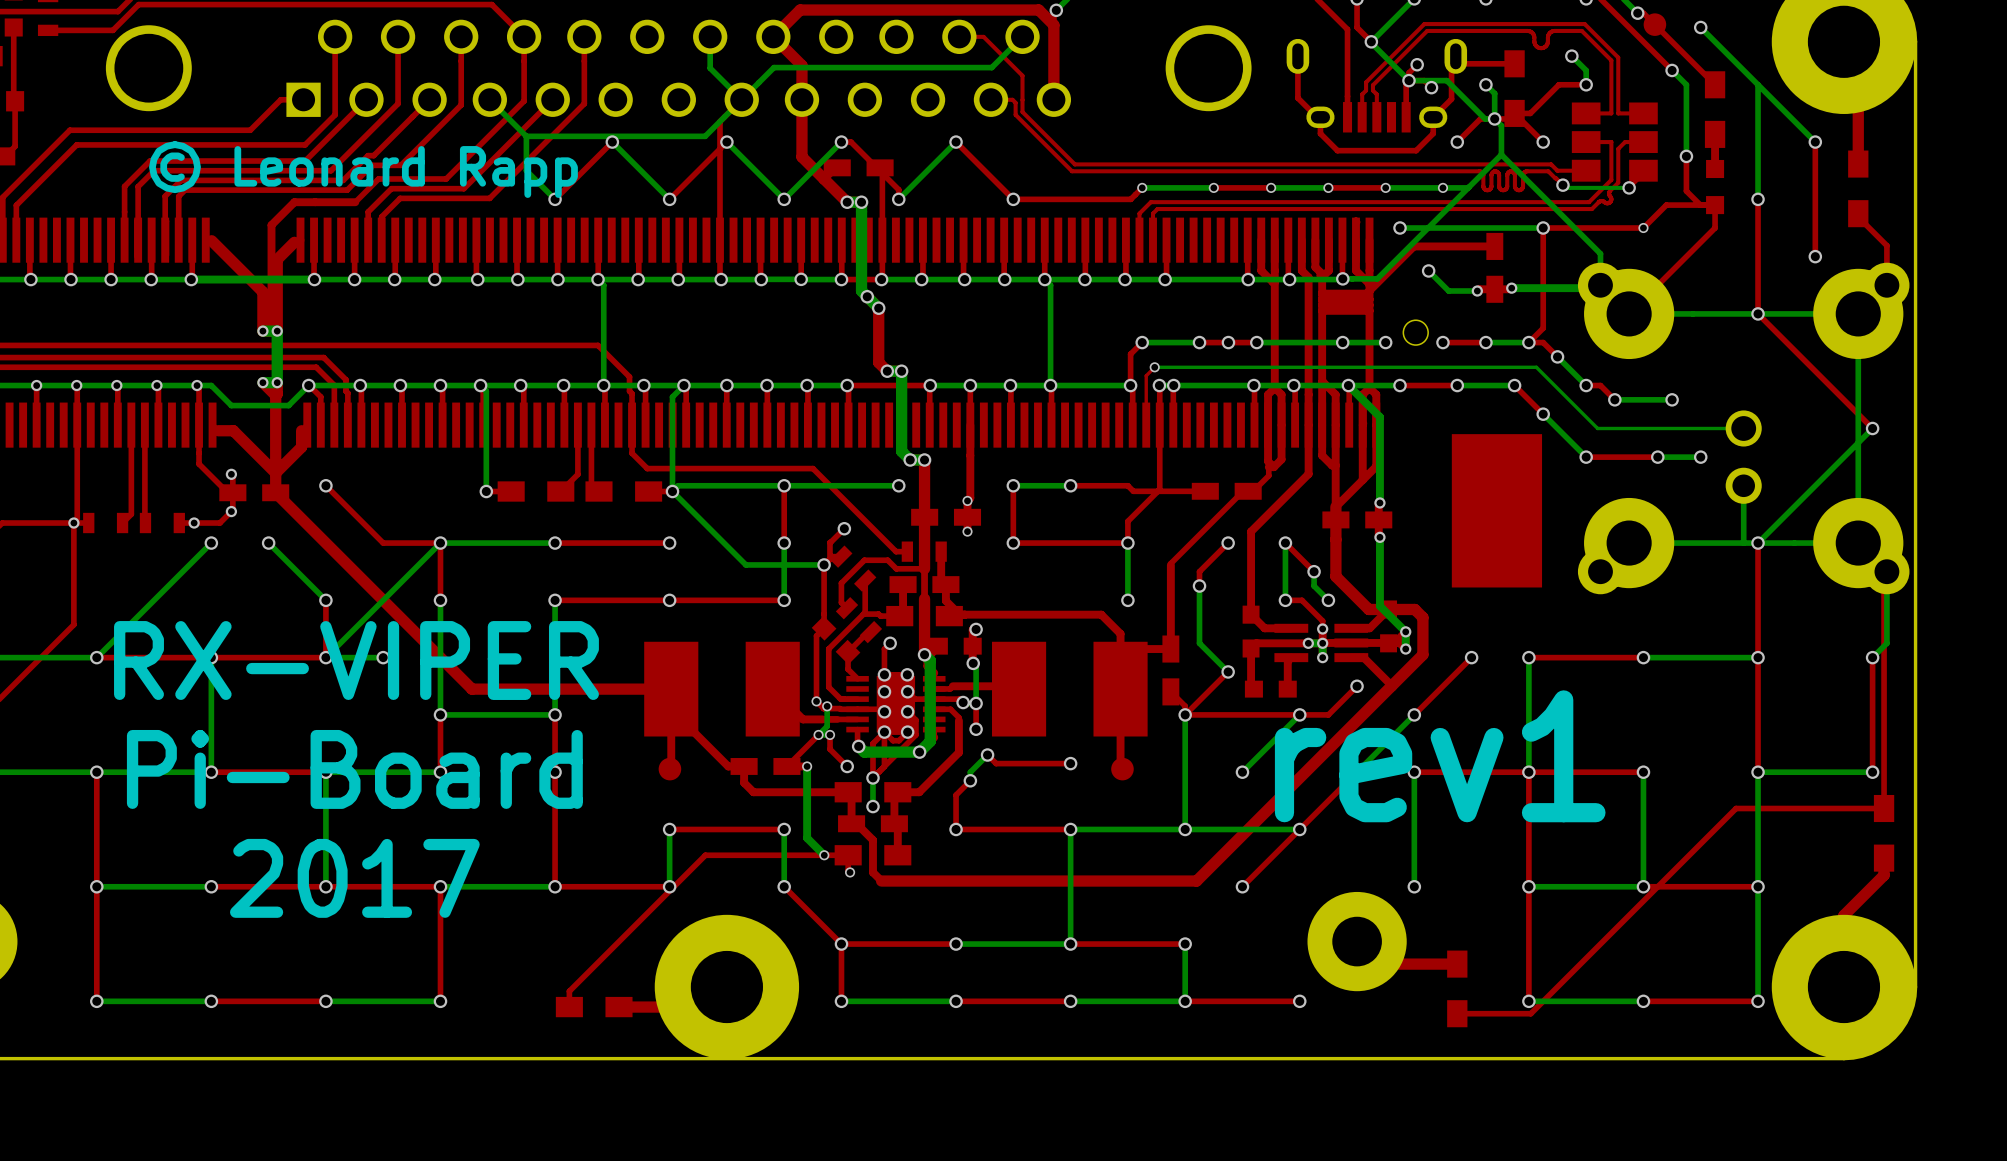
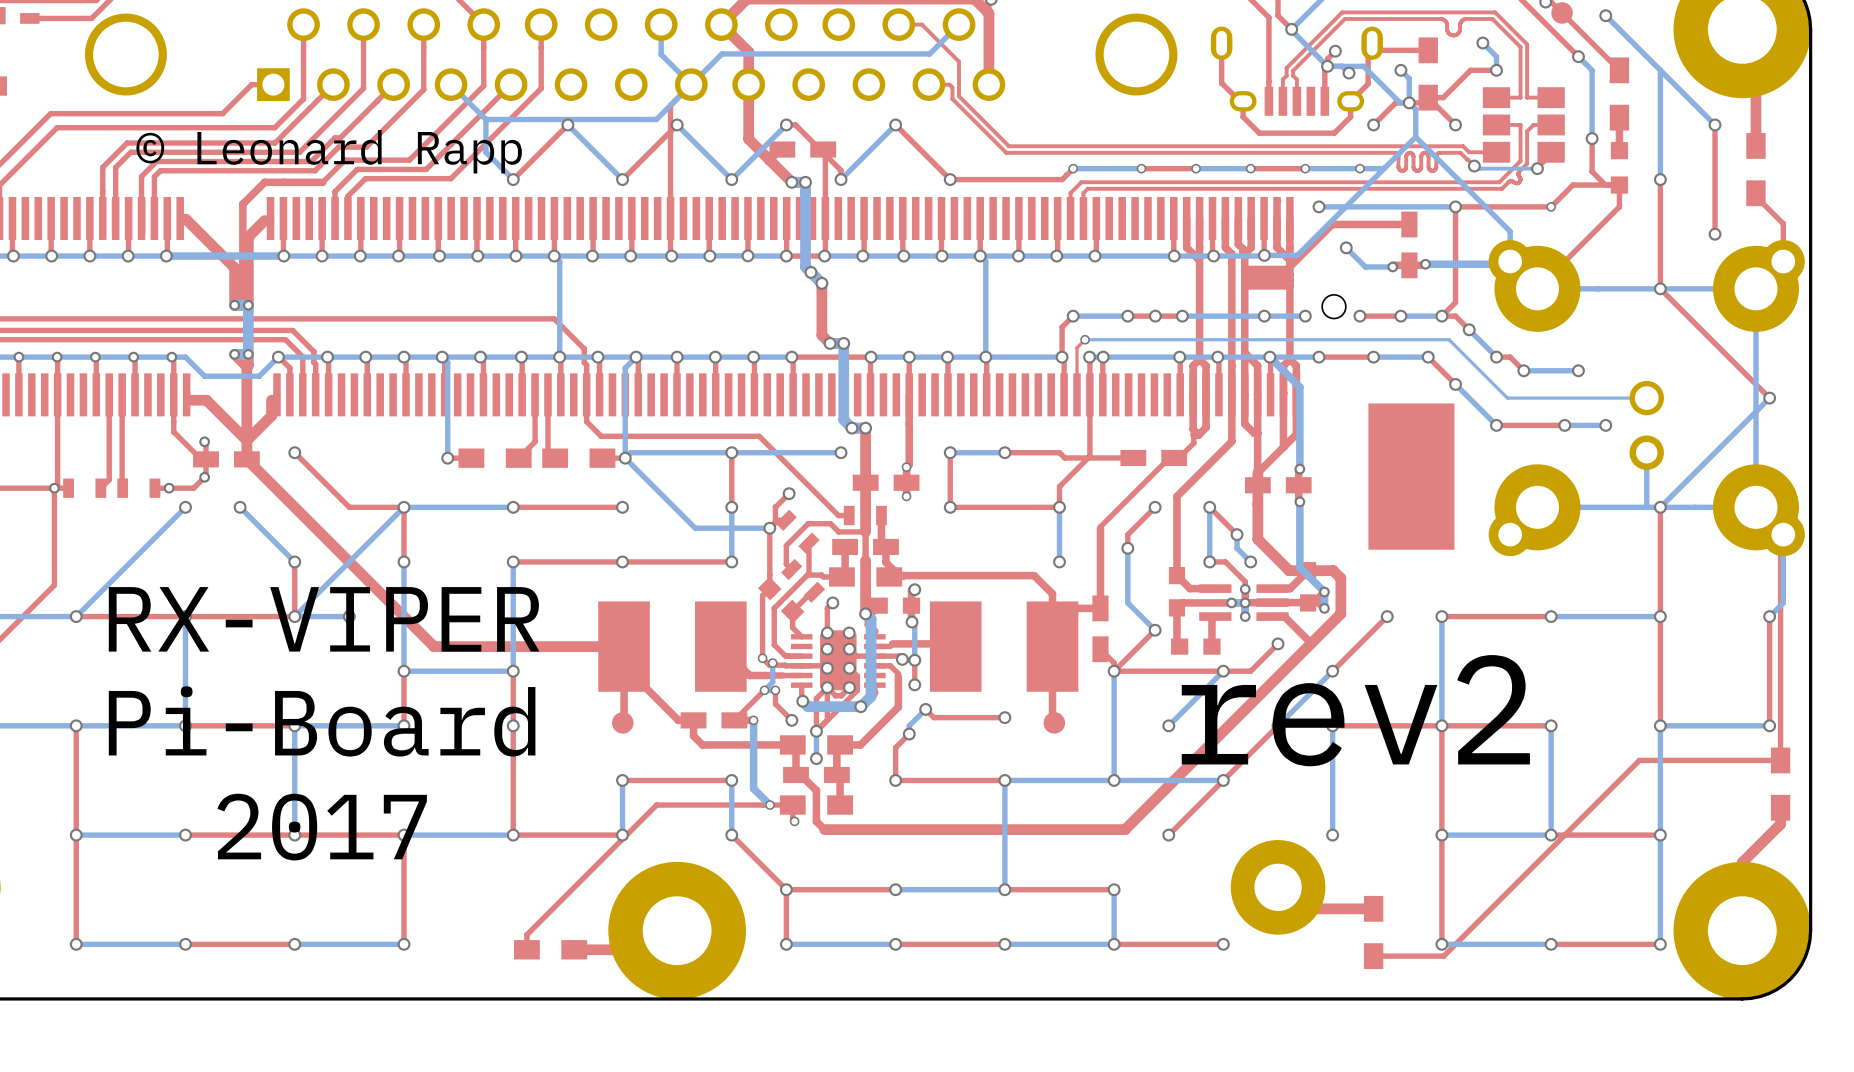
text: rev1 (1440, 756) -> rev2 (1355, 710)

